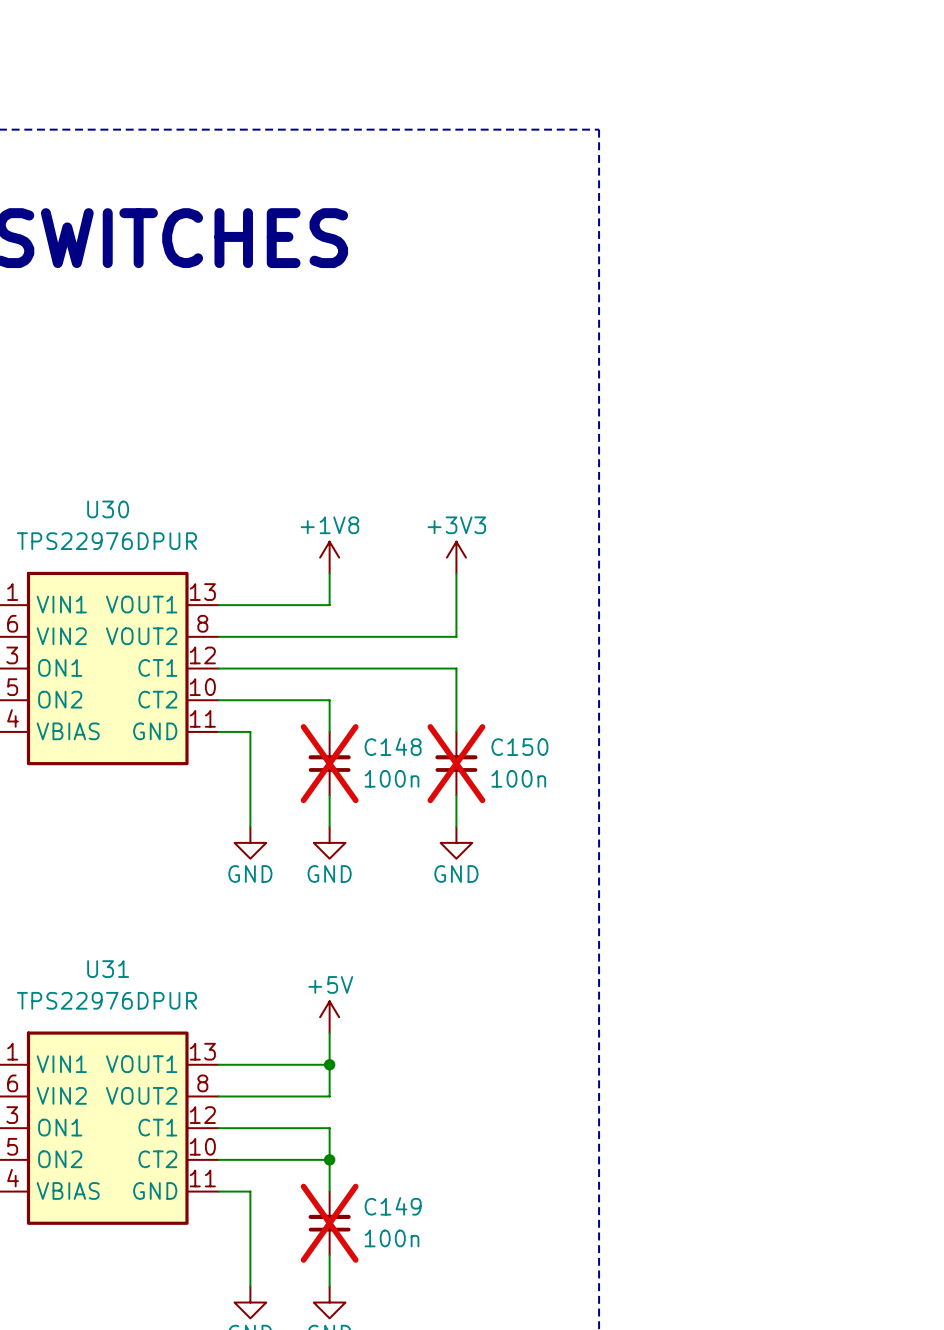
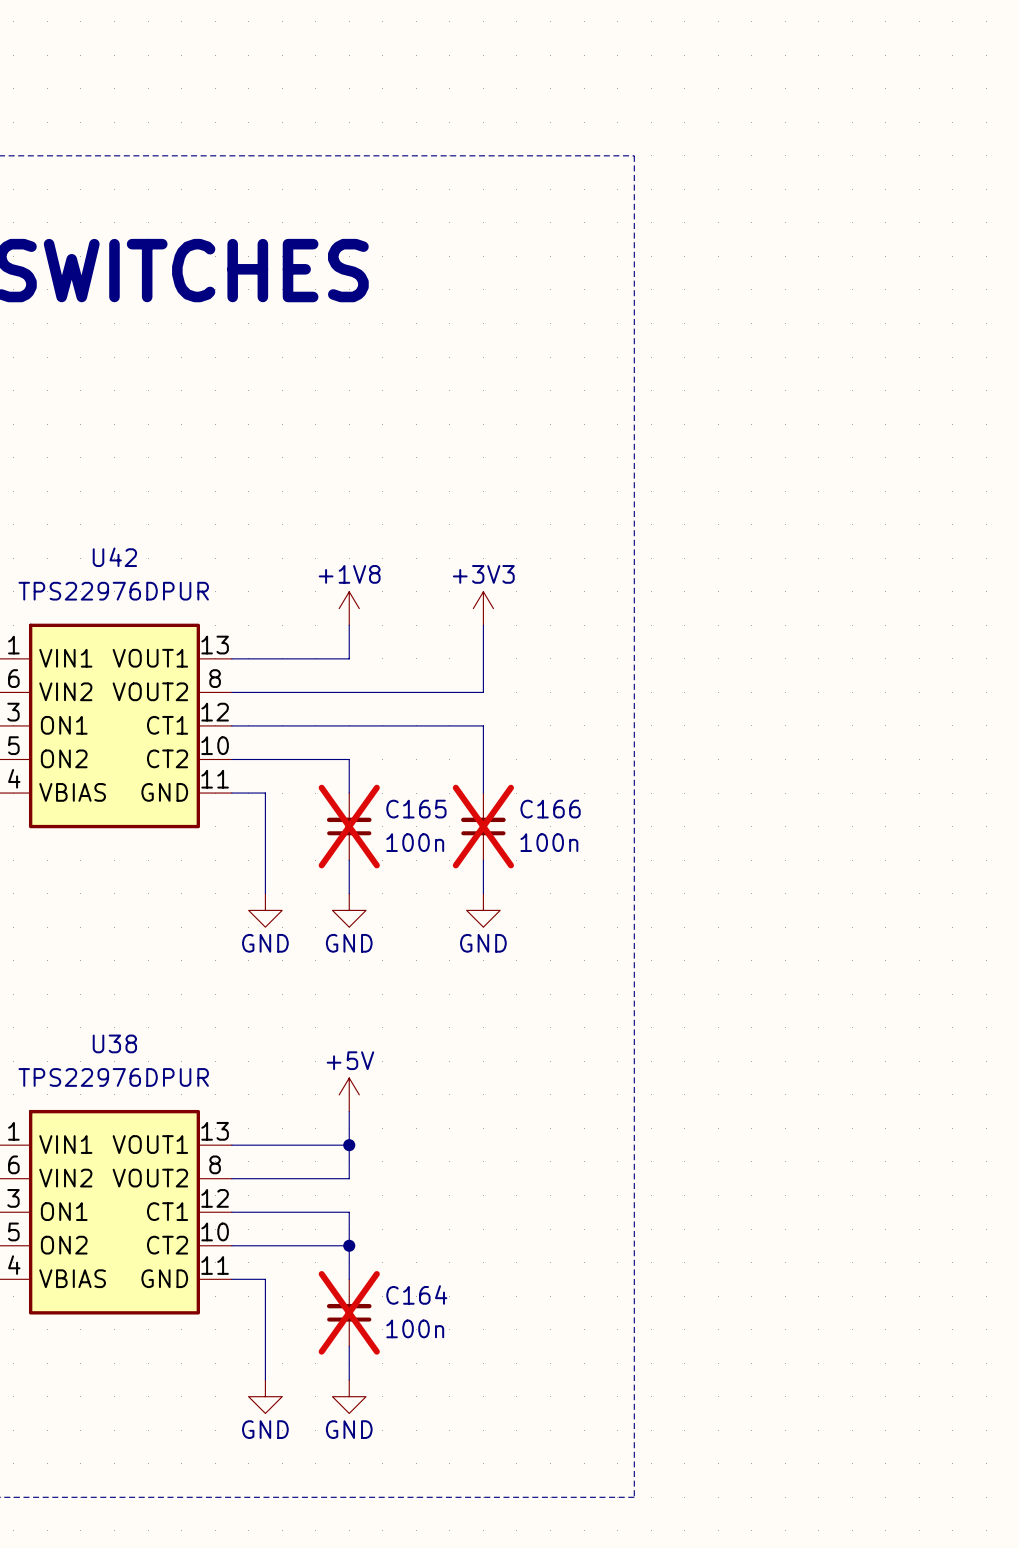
U30 name: U30 (108, 509) -> U42 (114, 557)
C148 name: C148 (393, 746) -> C165 (416, 809)
C150 name: C150 (519, 747) -> C166 (550, 809)
U31 name: U31 (108, 969) -> U38 (114, 1043)
C149 name: C149 (393, 1206) -> C164 (416, 1294)

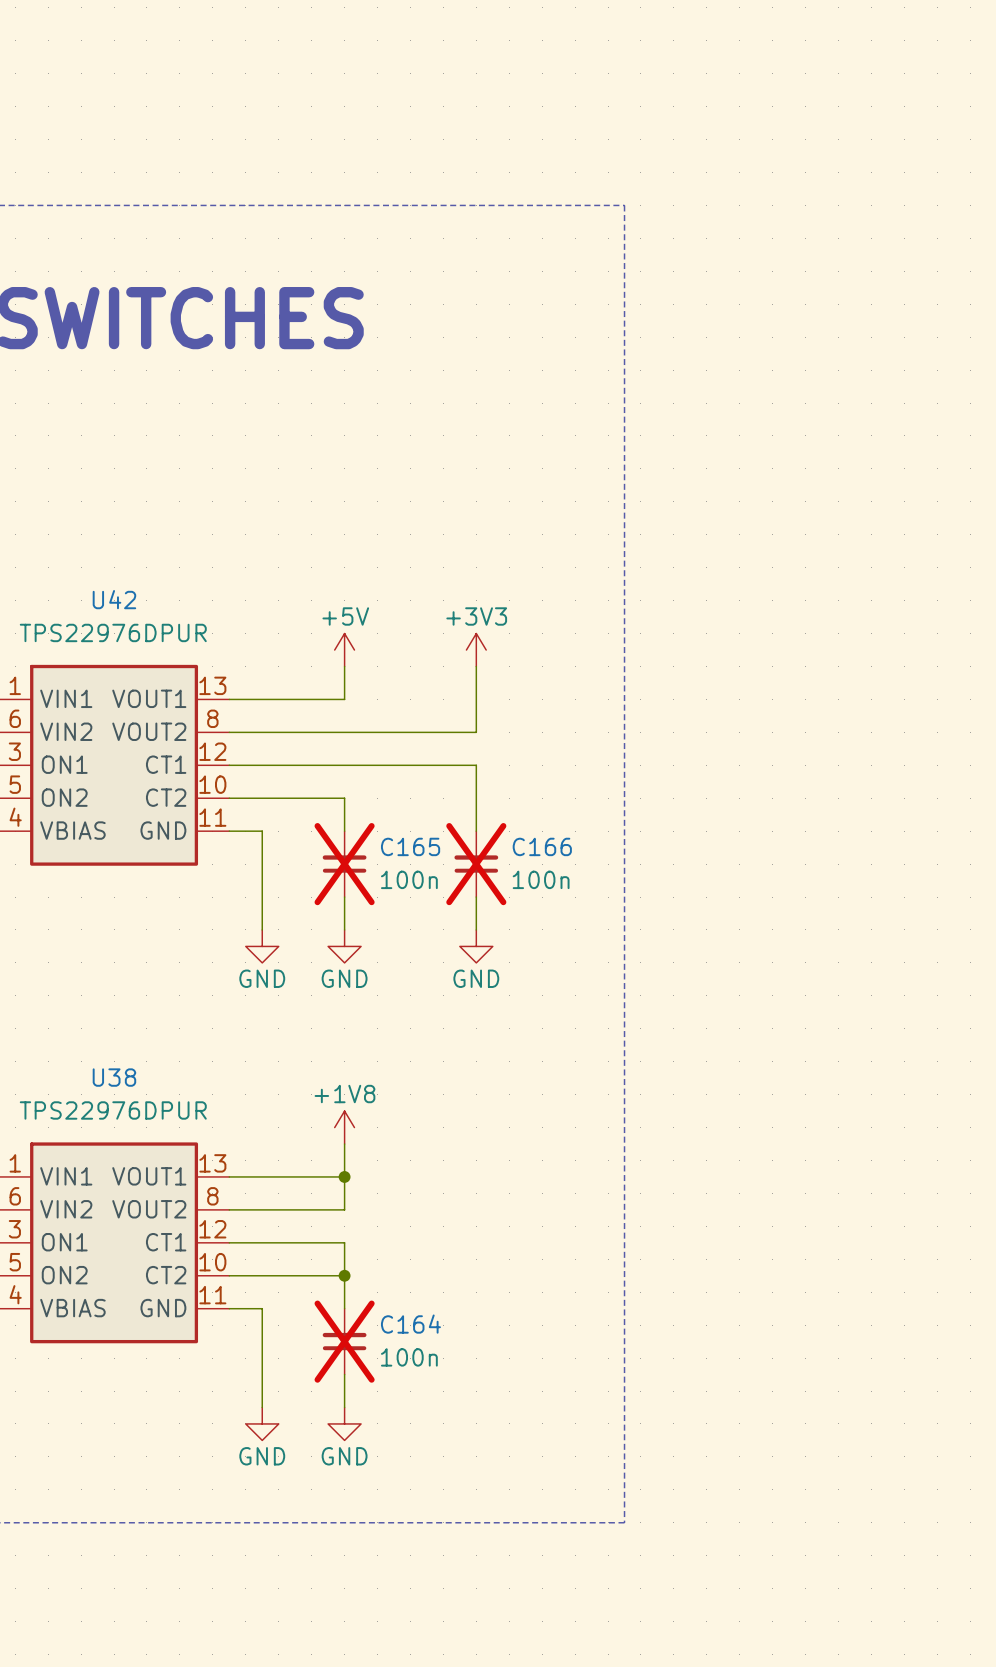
power symbol: +1V8 (349, 608) -> +5V (344, 650)
power symbol: +5V (349, 1094) -> +1V8 (344, 1127)

